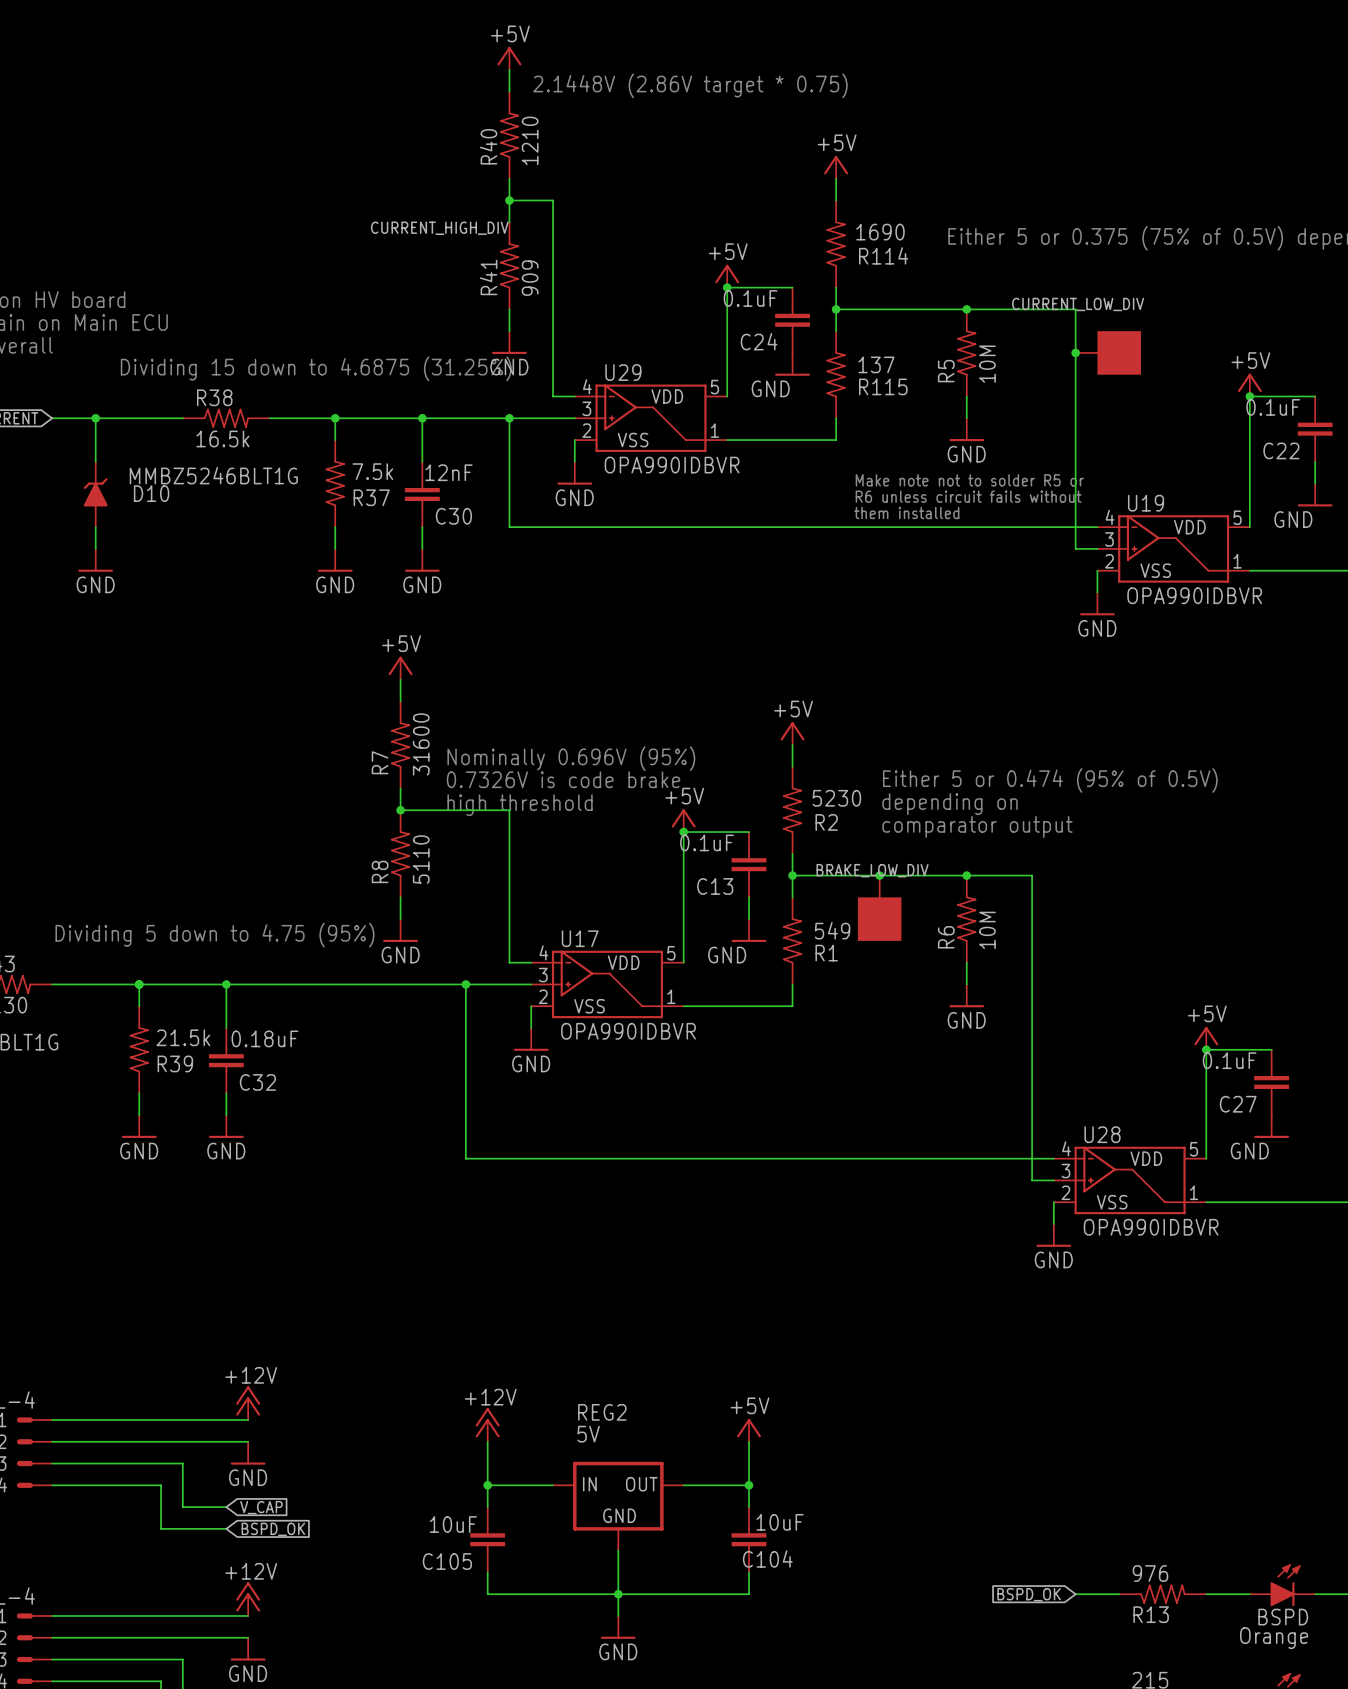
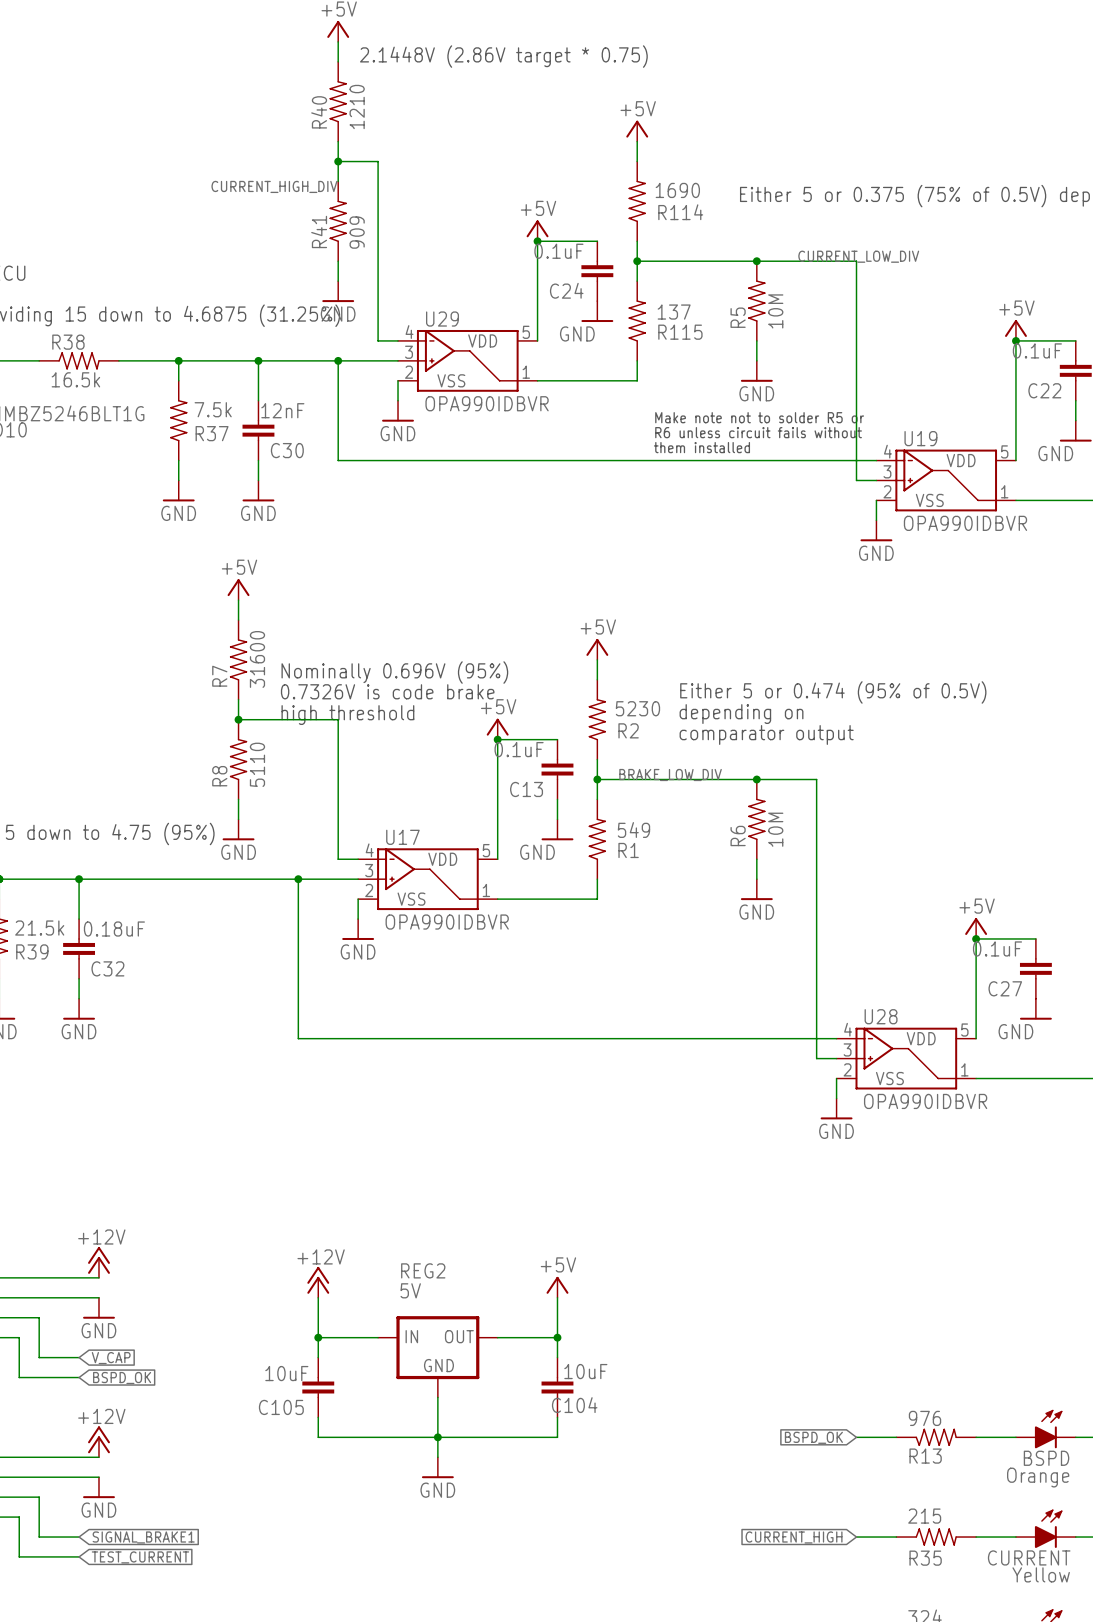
junction: (1075, 352) -> none
part: (1108, 352) -> none
junction: (879, 875) -> none
part: (879, 908) -> none

